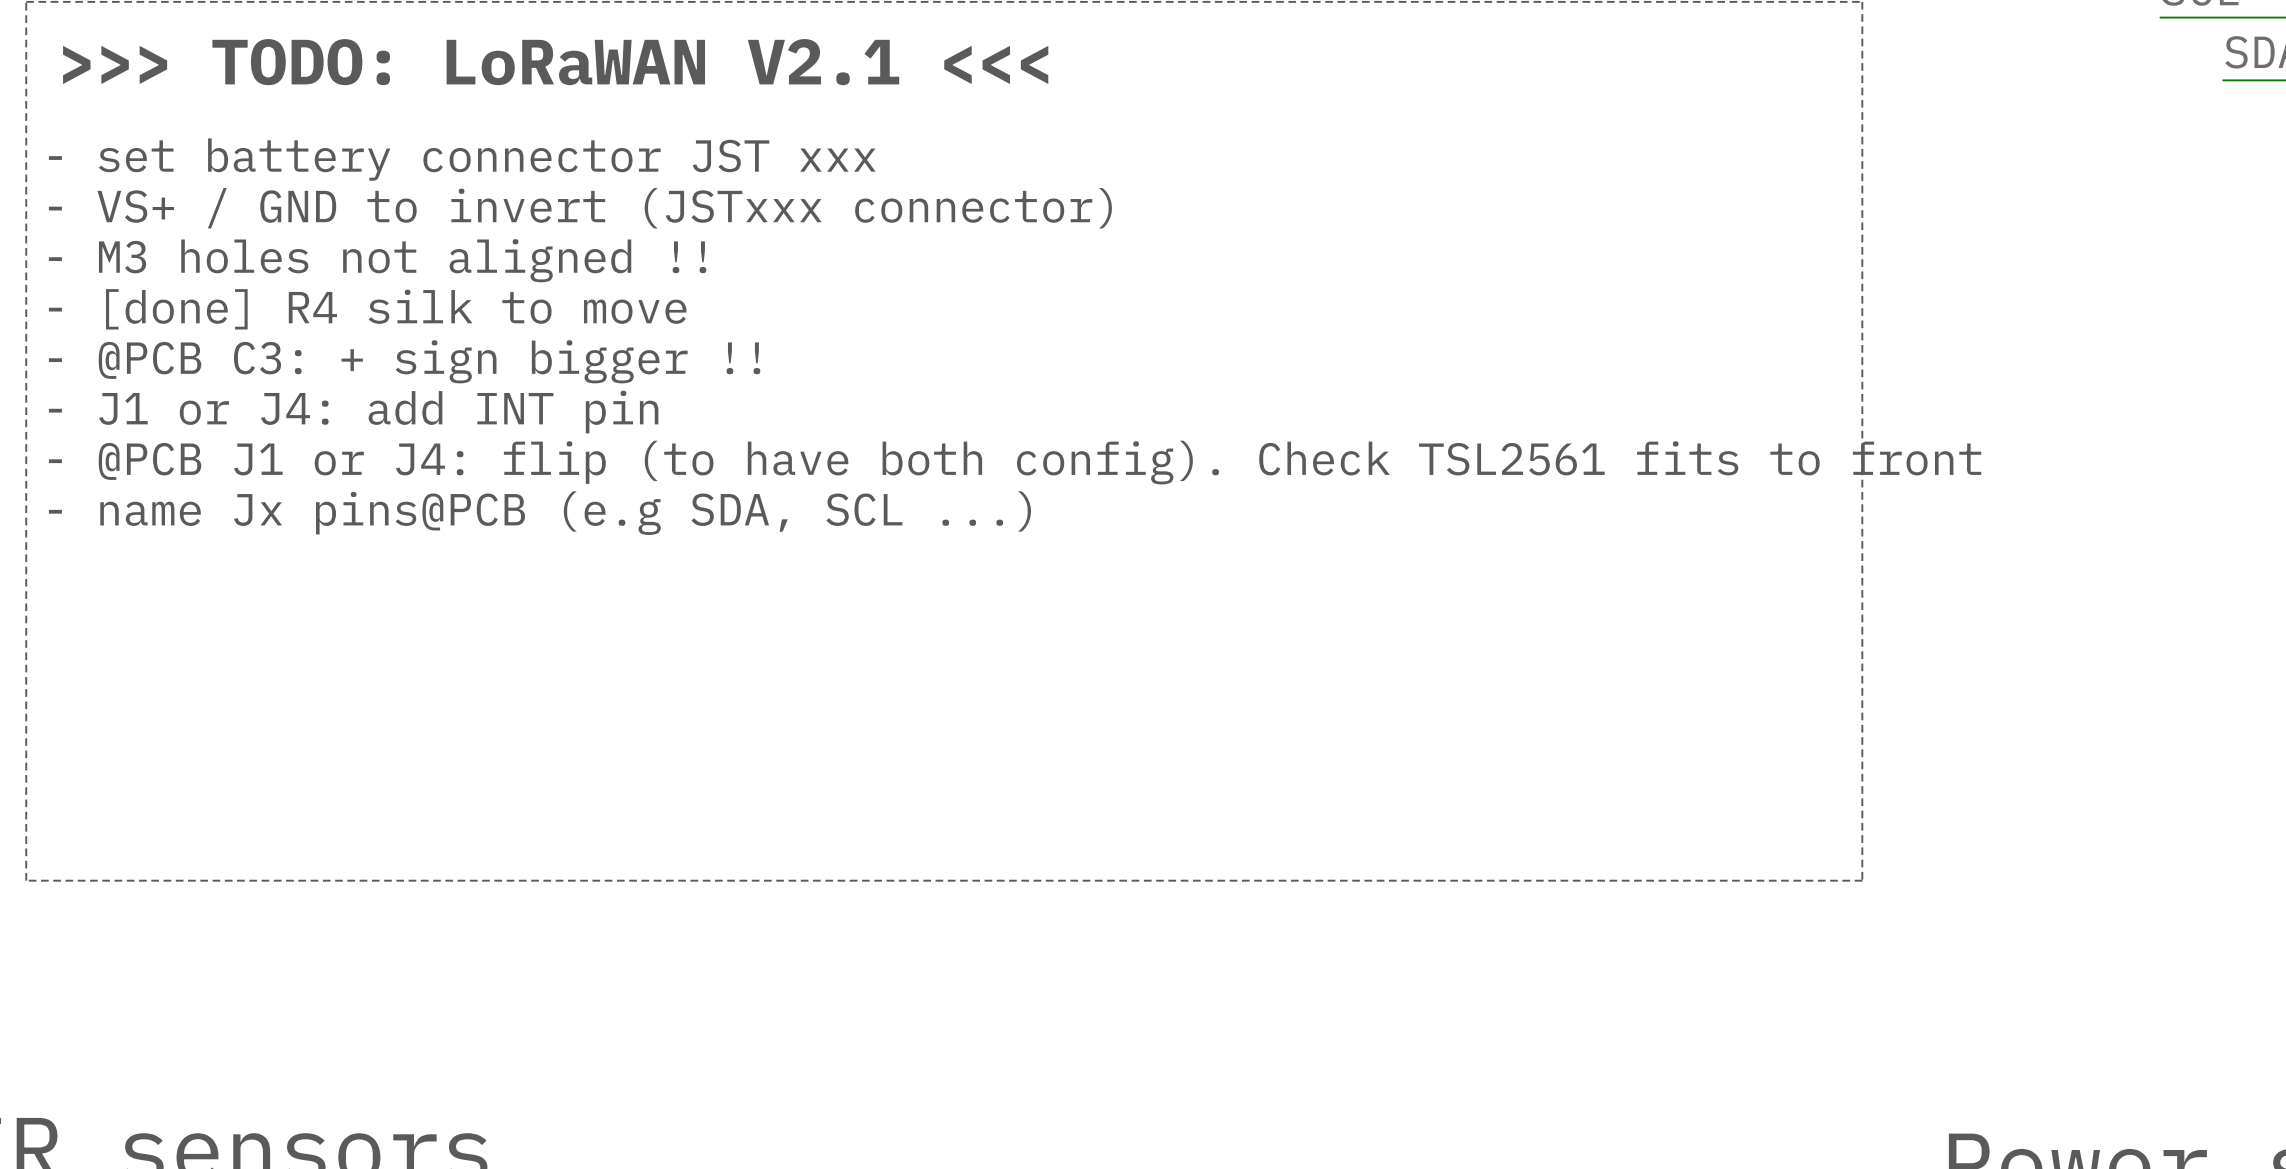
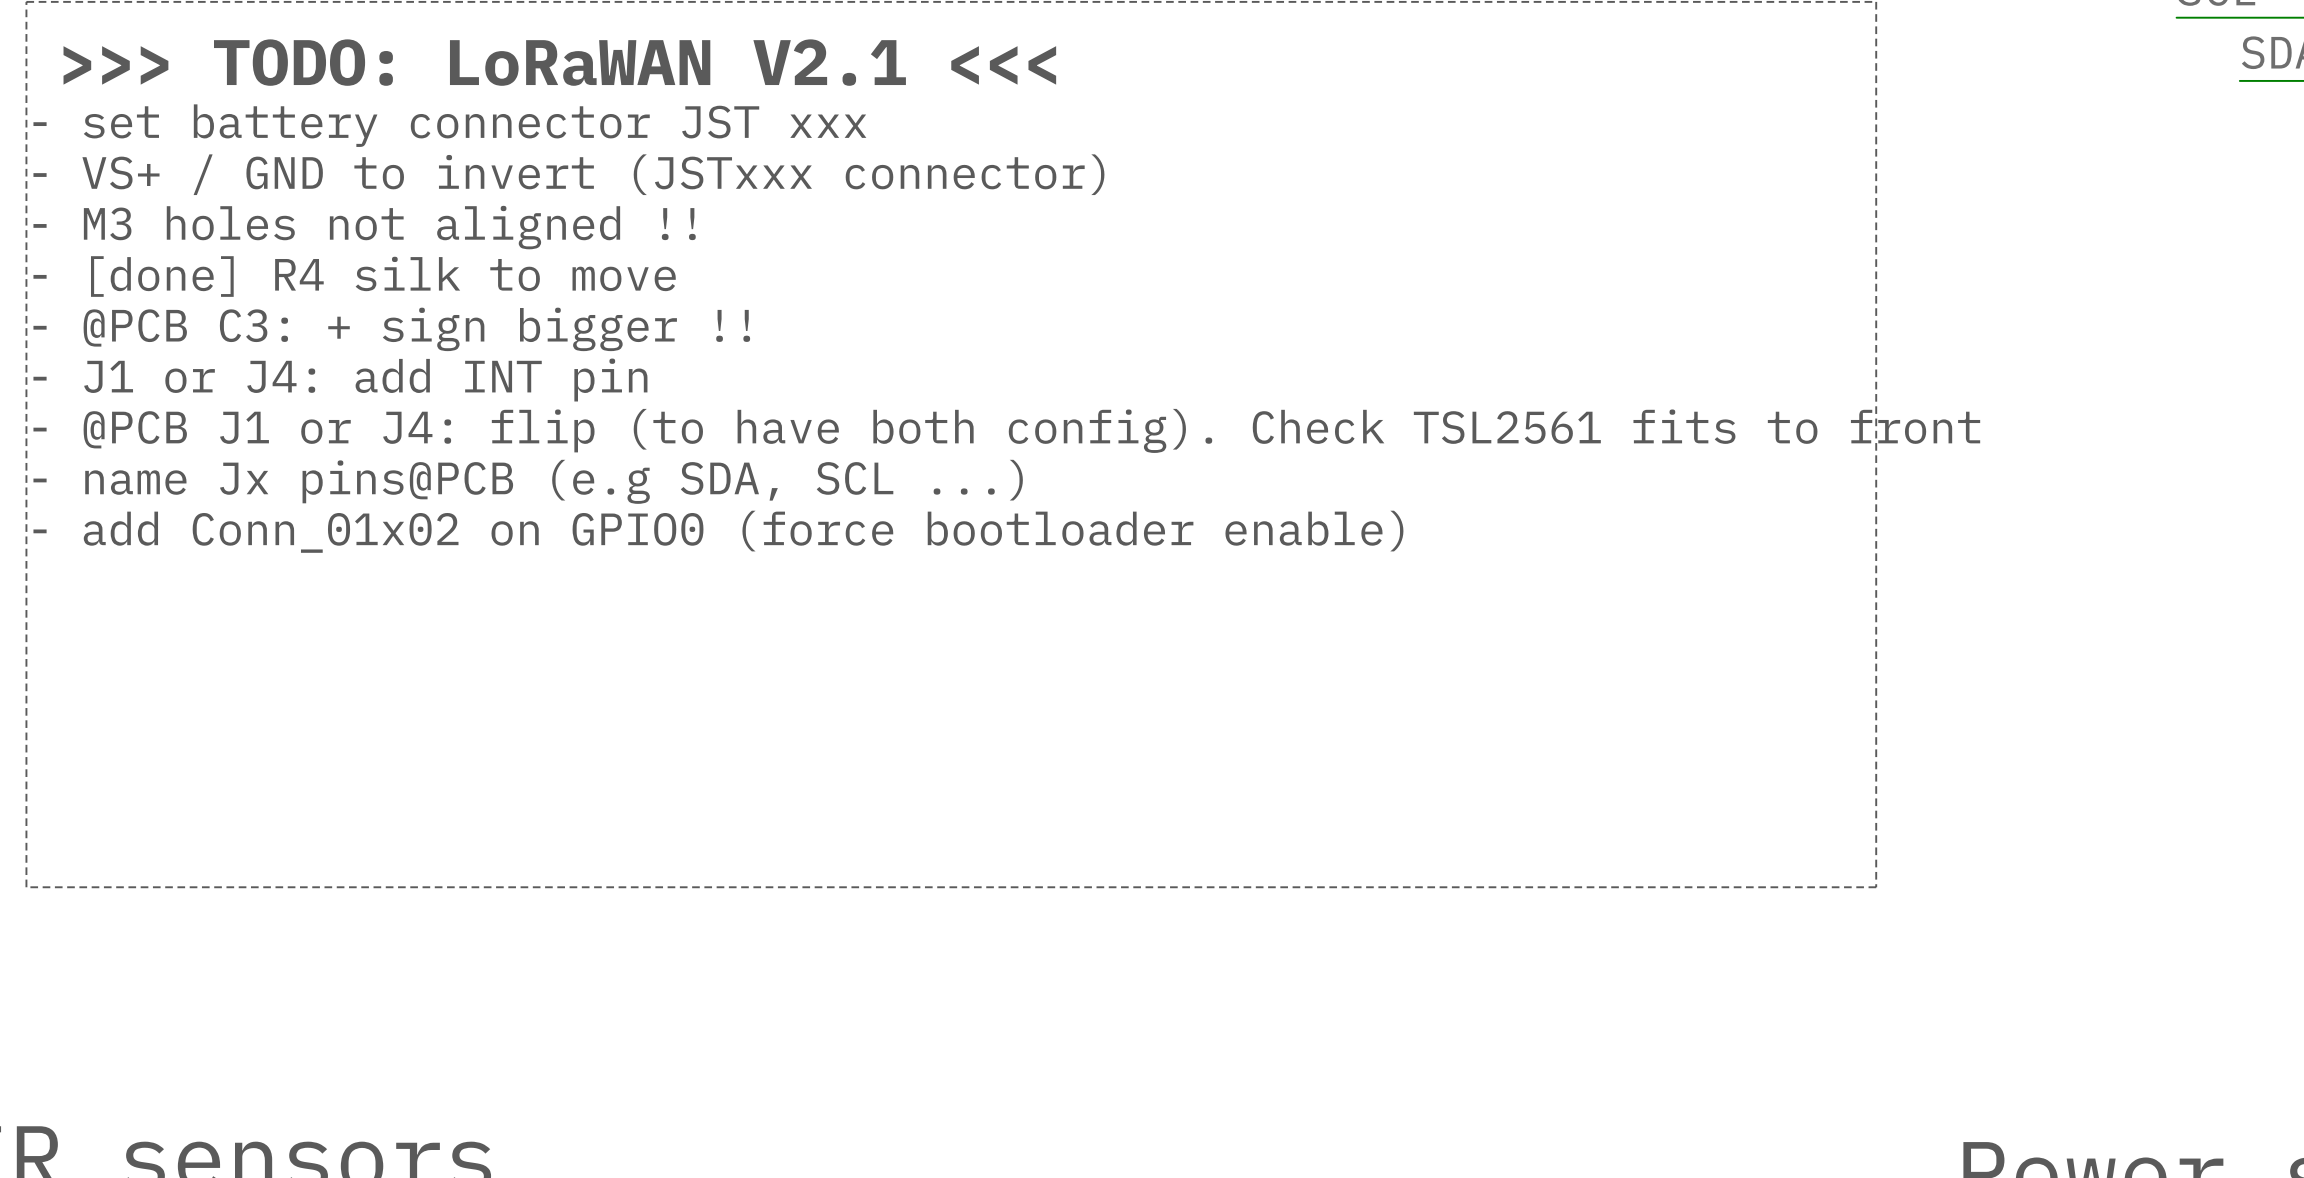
text position: - set battery connector JST xxx (462, 159) -> - set battery connector JST xxx (449, 125)
text position: - VS+ / GND to invert (JSTxxx connector) (580, 208) -> - VS+ / GND to invert (JSTxxx connector) (568, 174)
text position: - M3 holes not aligned !! (377, 260) -> - M3 holes not aligned !! (364, 227)
text position: - [done] R4 silk to move (367, 309) -> - [done] R4 silk to move (354, 276)
text position: - @PCB C3: + sign bigger !! (404, 361) -> - @PCB C3: + sign bigger !! (391, 329)
text position: - J1 or J4: add INT pin (353, 412) -> - J1 or J4: add INT pin (340, 380)
text position: - @PCB J1 or J4: flip (to have both config). Check TSL2561 fits to front (1015, 462) -> - @PCB J1 or J4: flip (to have both config). Check TSL2561 fits to front (1006, 430)
text position: - name Jx pins@PCB (e.g SDA, SCL ...) (539, 513) -> - name Jx pins@PCB (e.g SDA, SCL ...) (528, 481)
text: none -> - add Conn_01x02 on GPIO0 (force bootloader enable) (718, 531)

